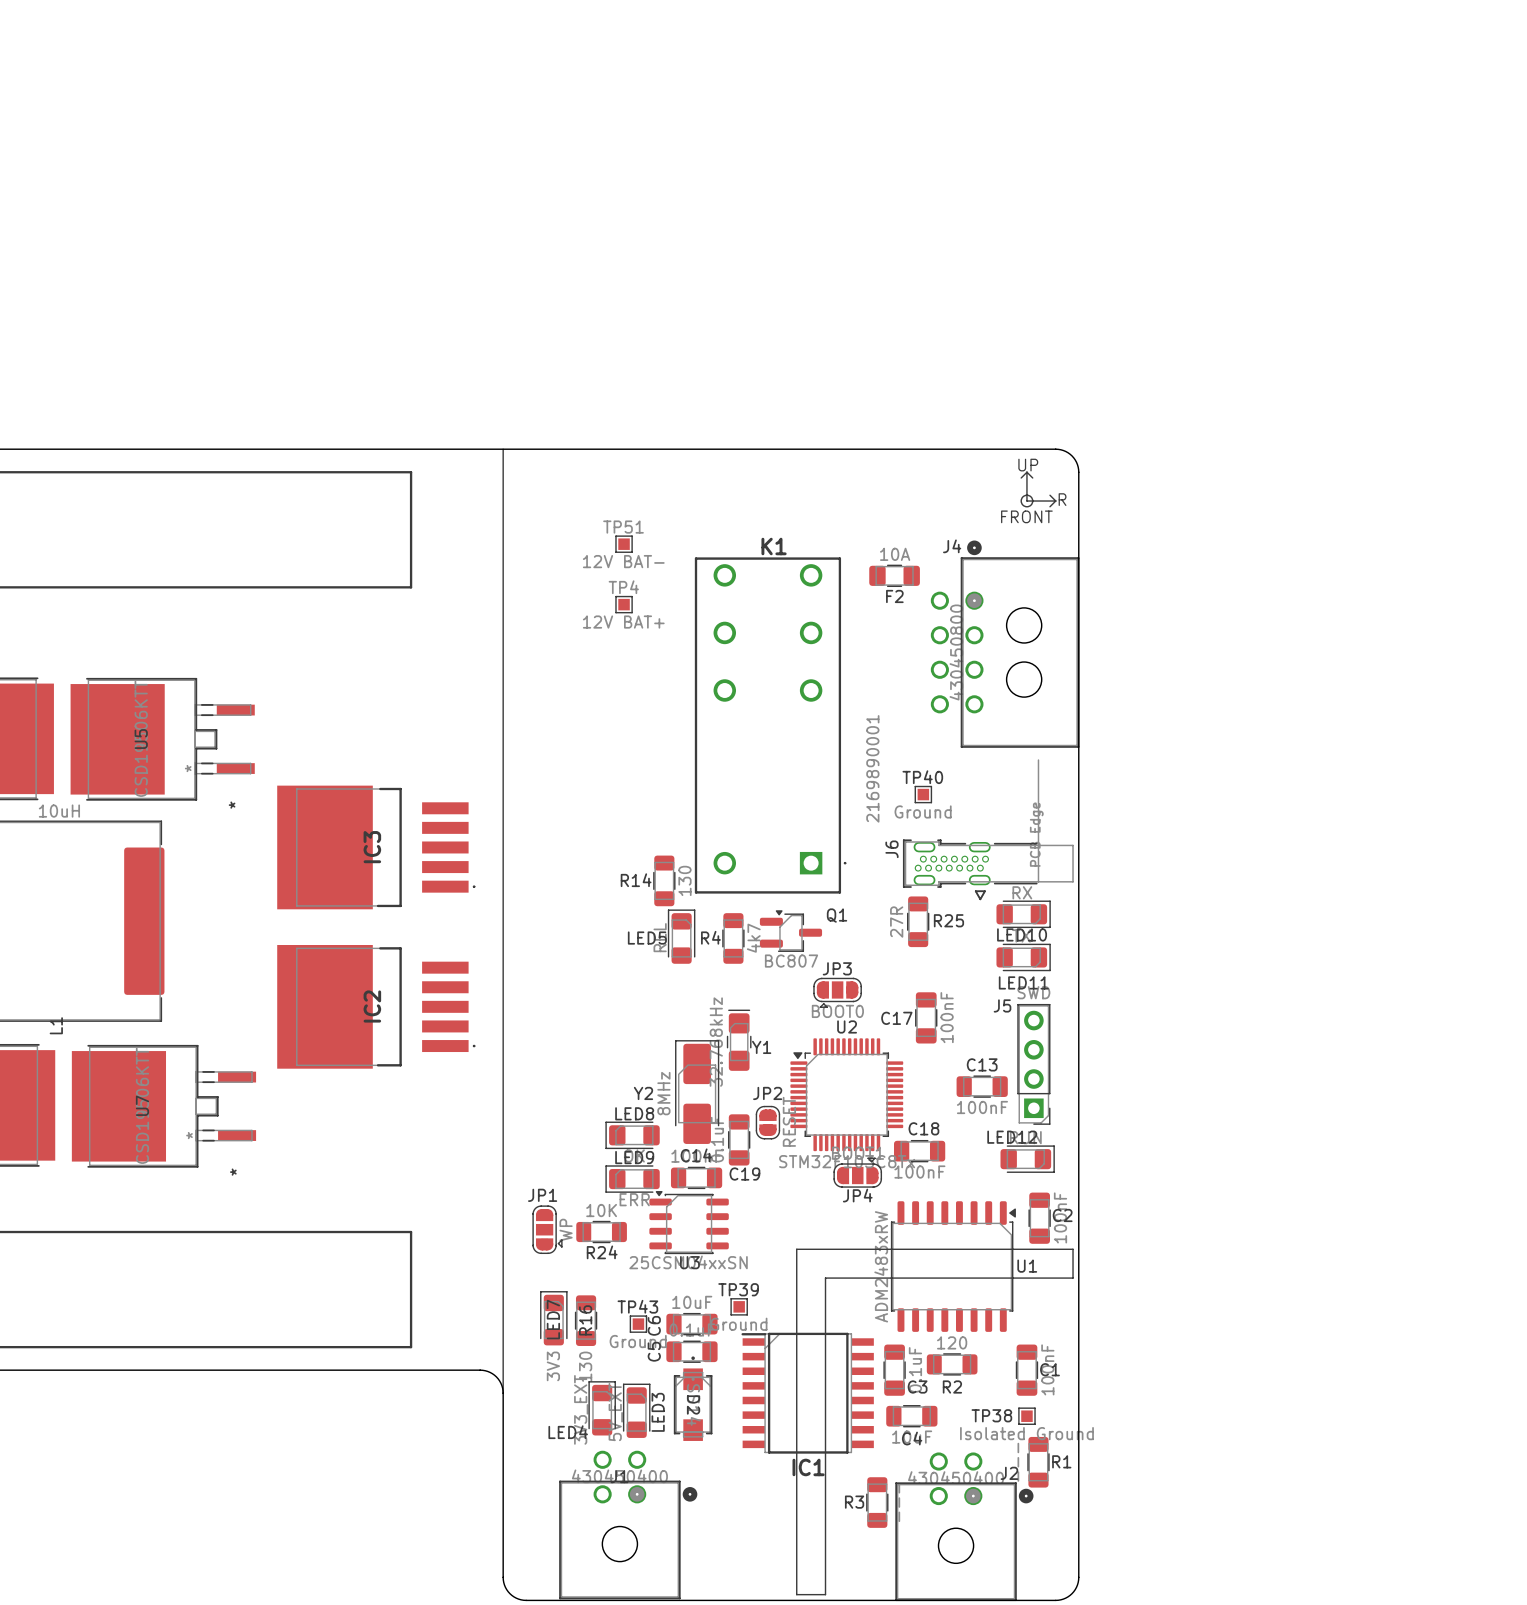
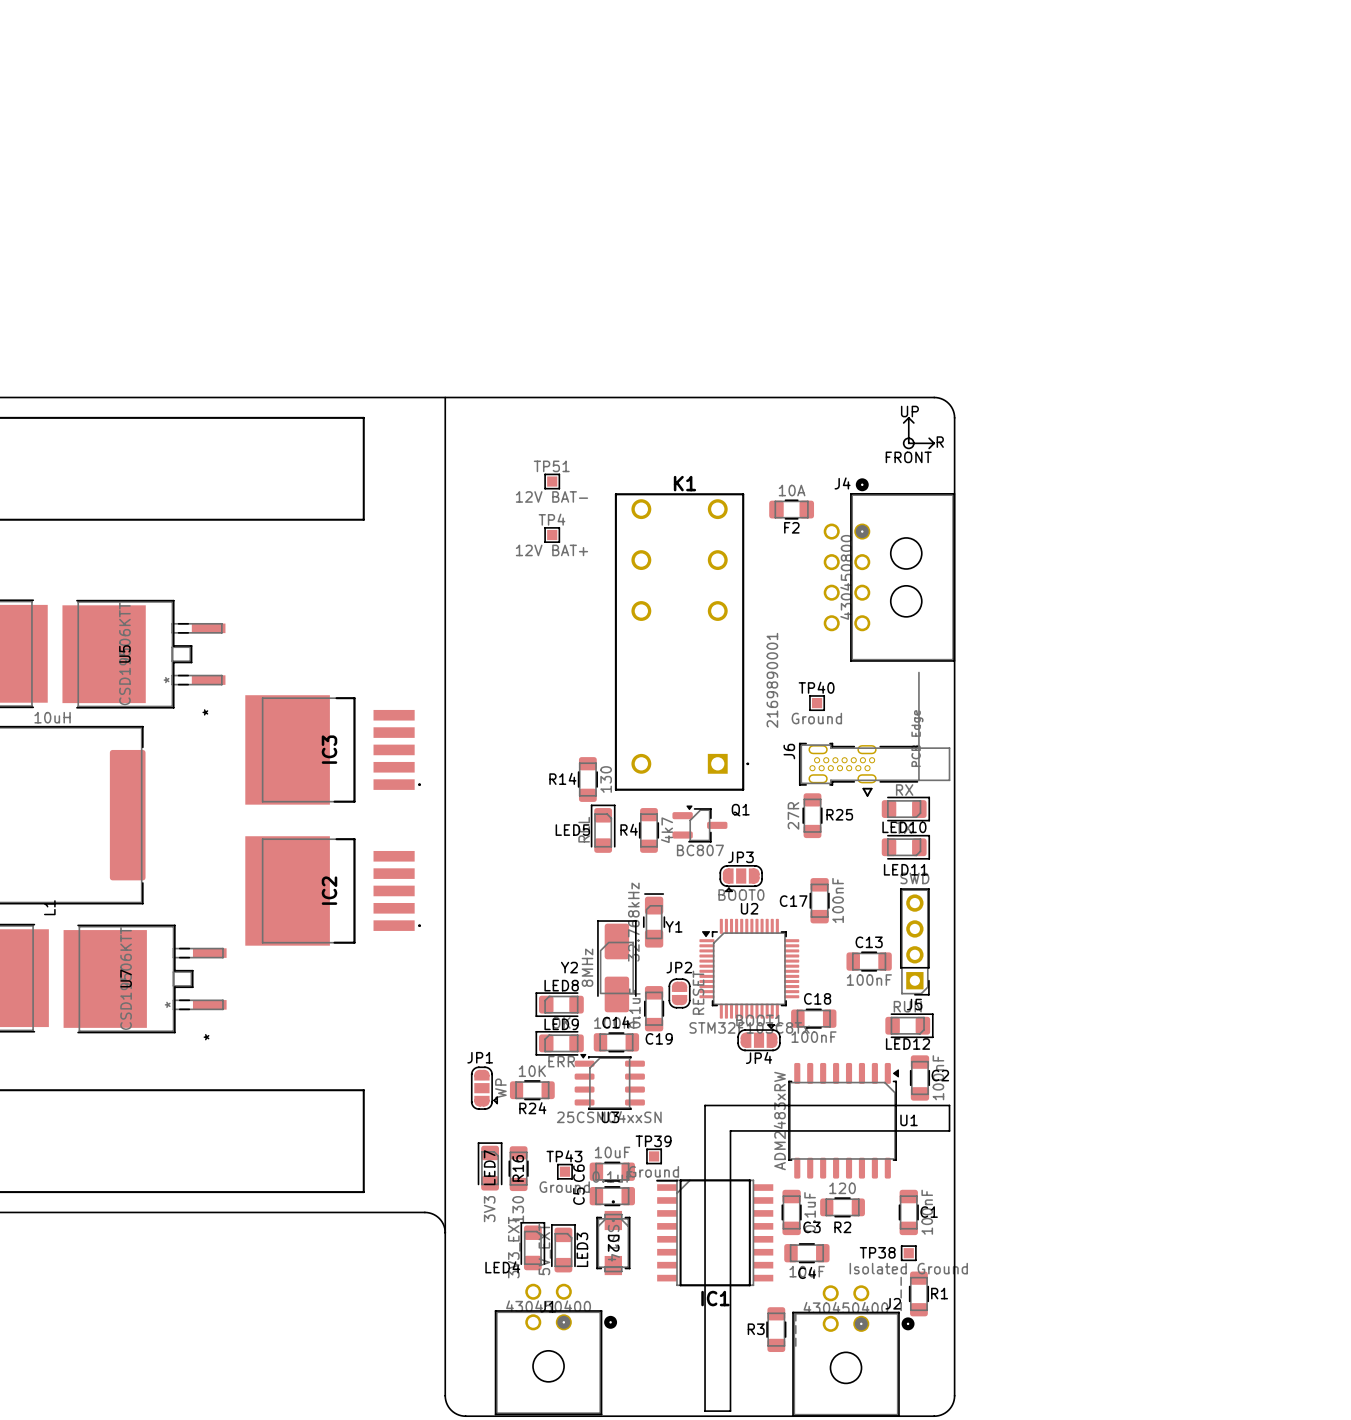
J5 name position: J5 (1002, 1005) -> J5 (914, 1004)
LED12 name position: LED12 (1012, 1137) -> LED12 (907, 1043)

